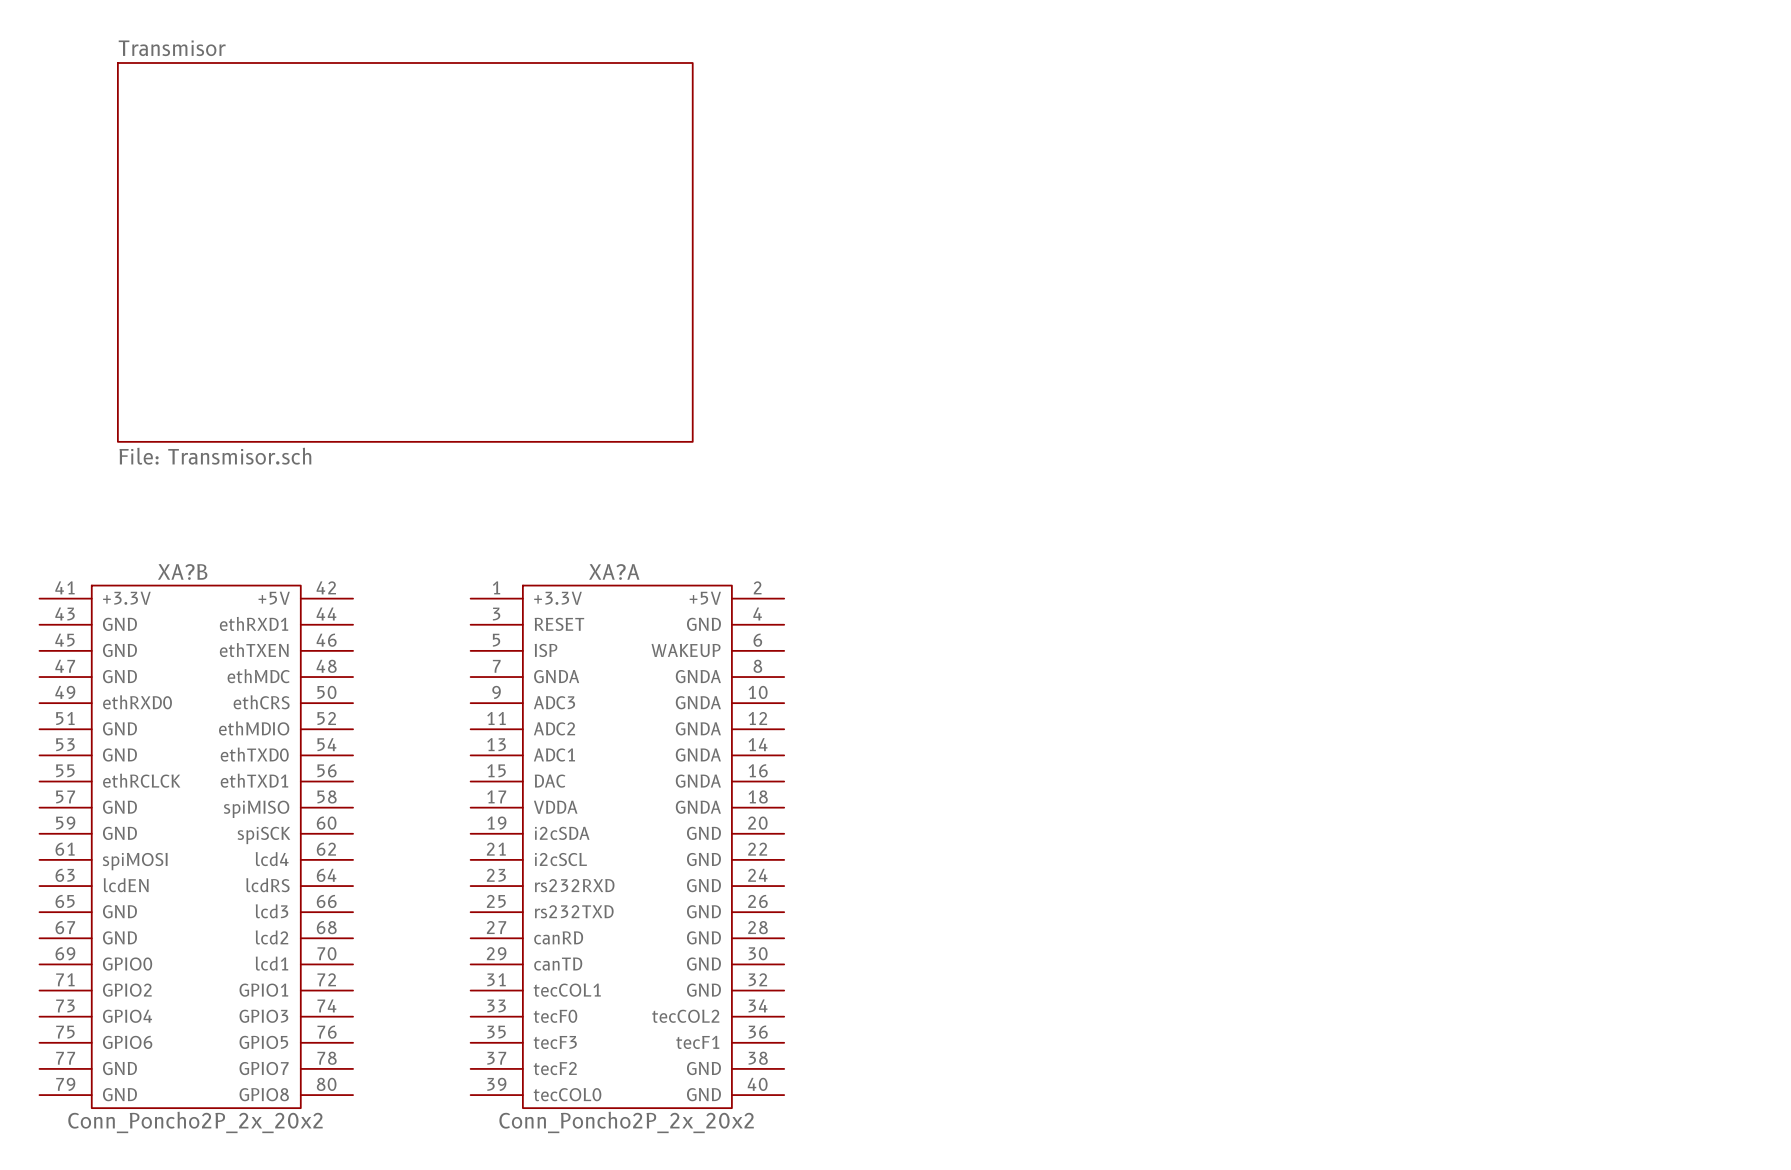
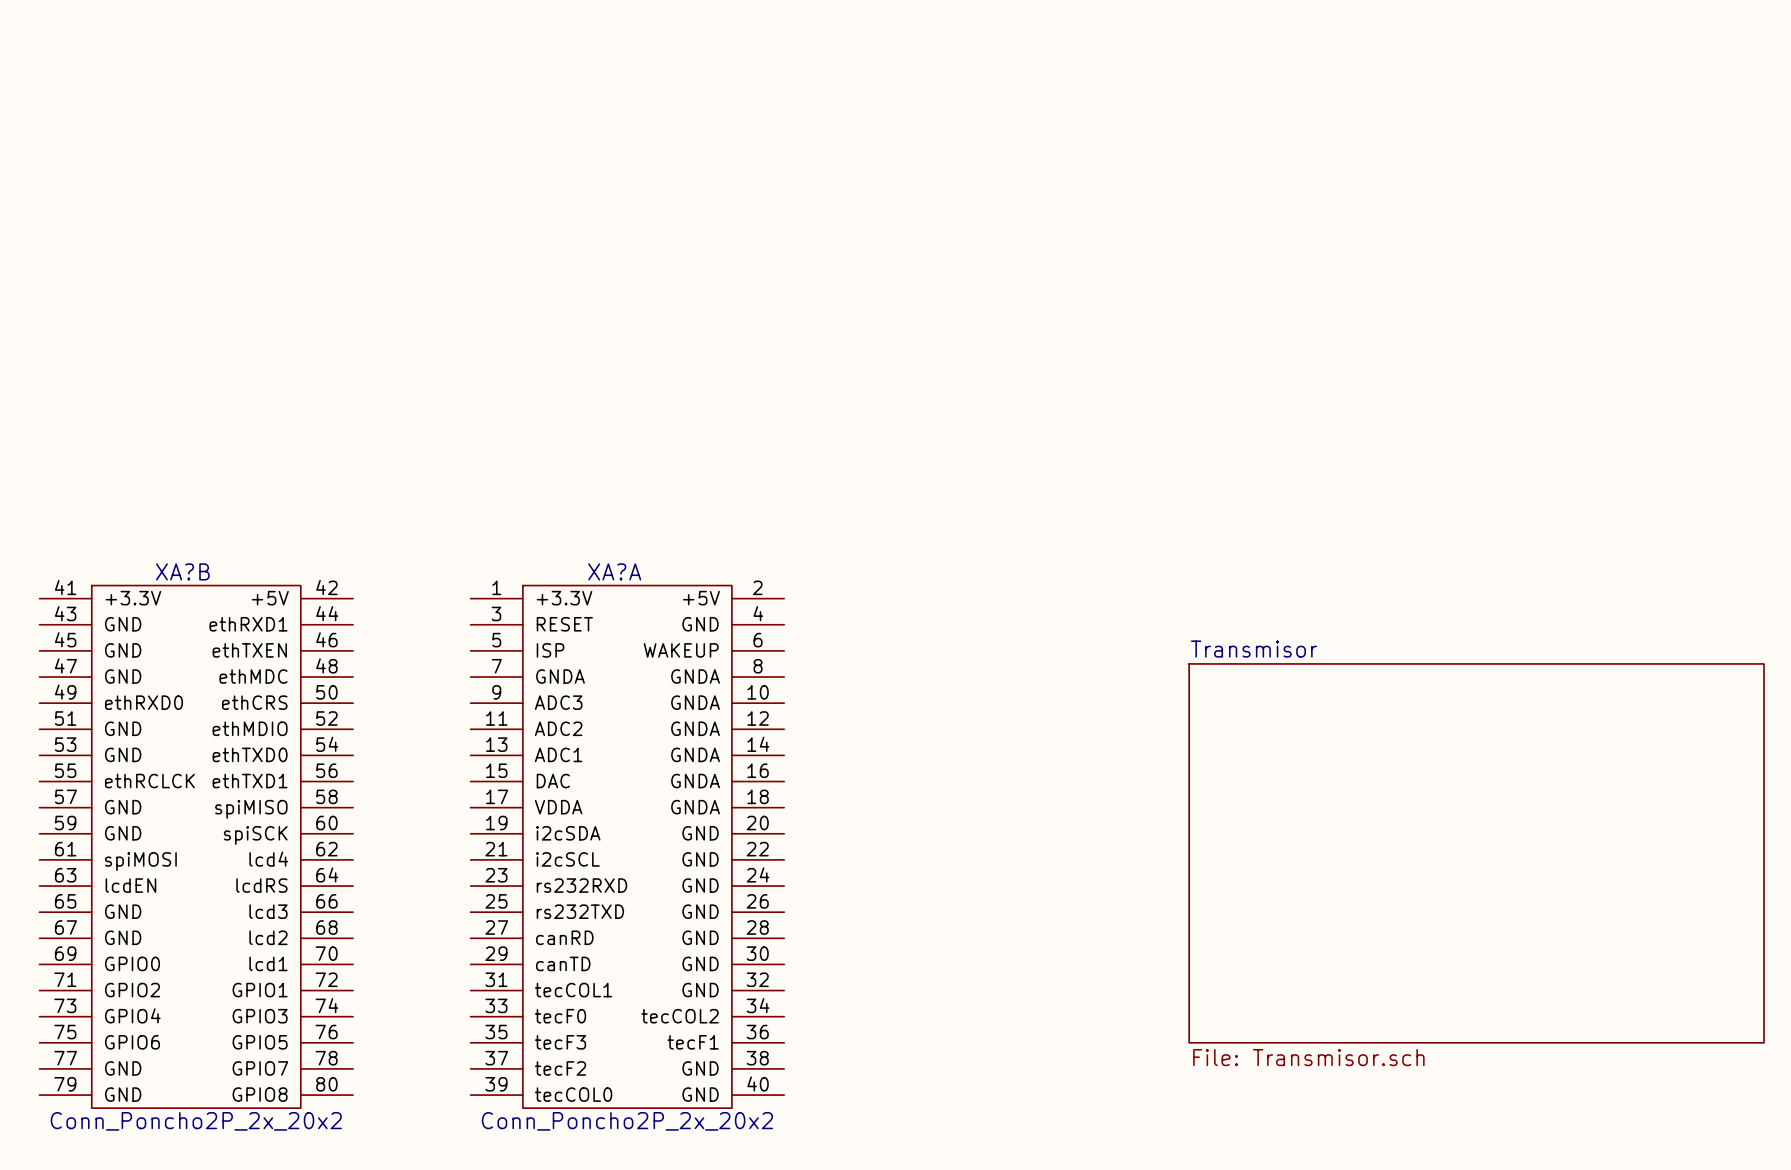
sheet Transmisor: File: Transmisor.sch (405, 252) -> none
sheet Transmisor: none -> File: Transmisor.sch (1476, 853)

